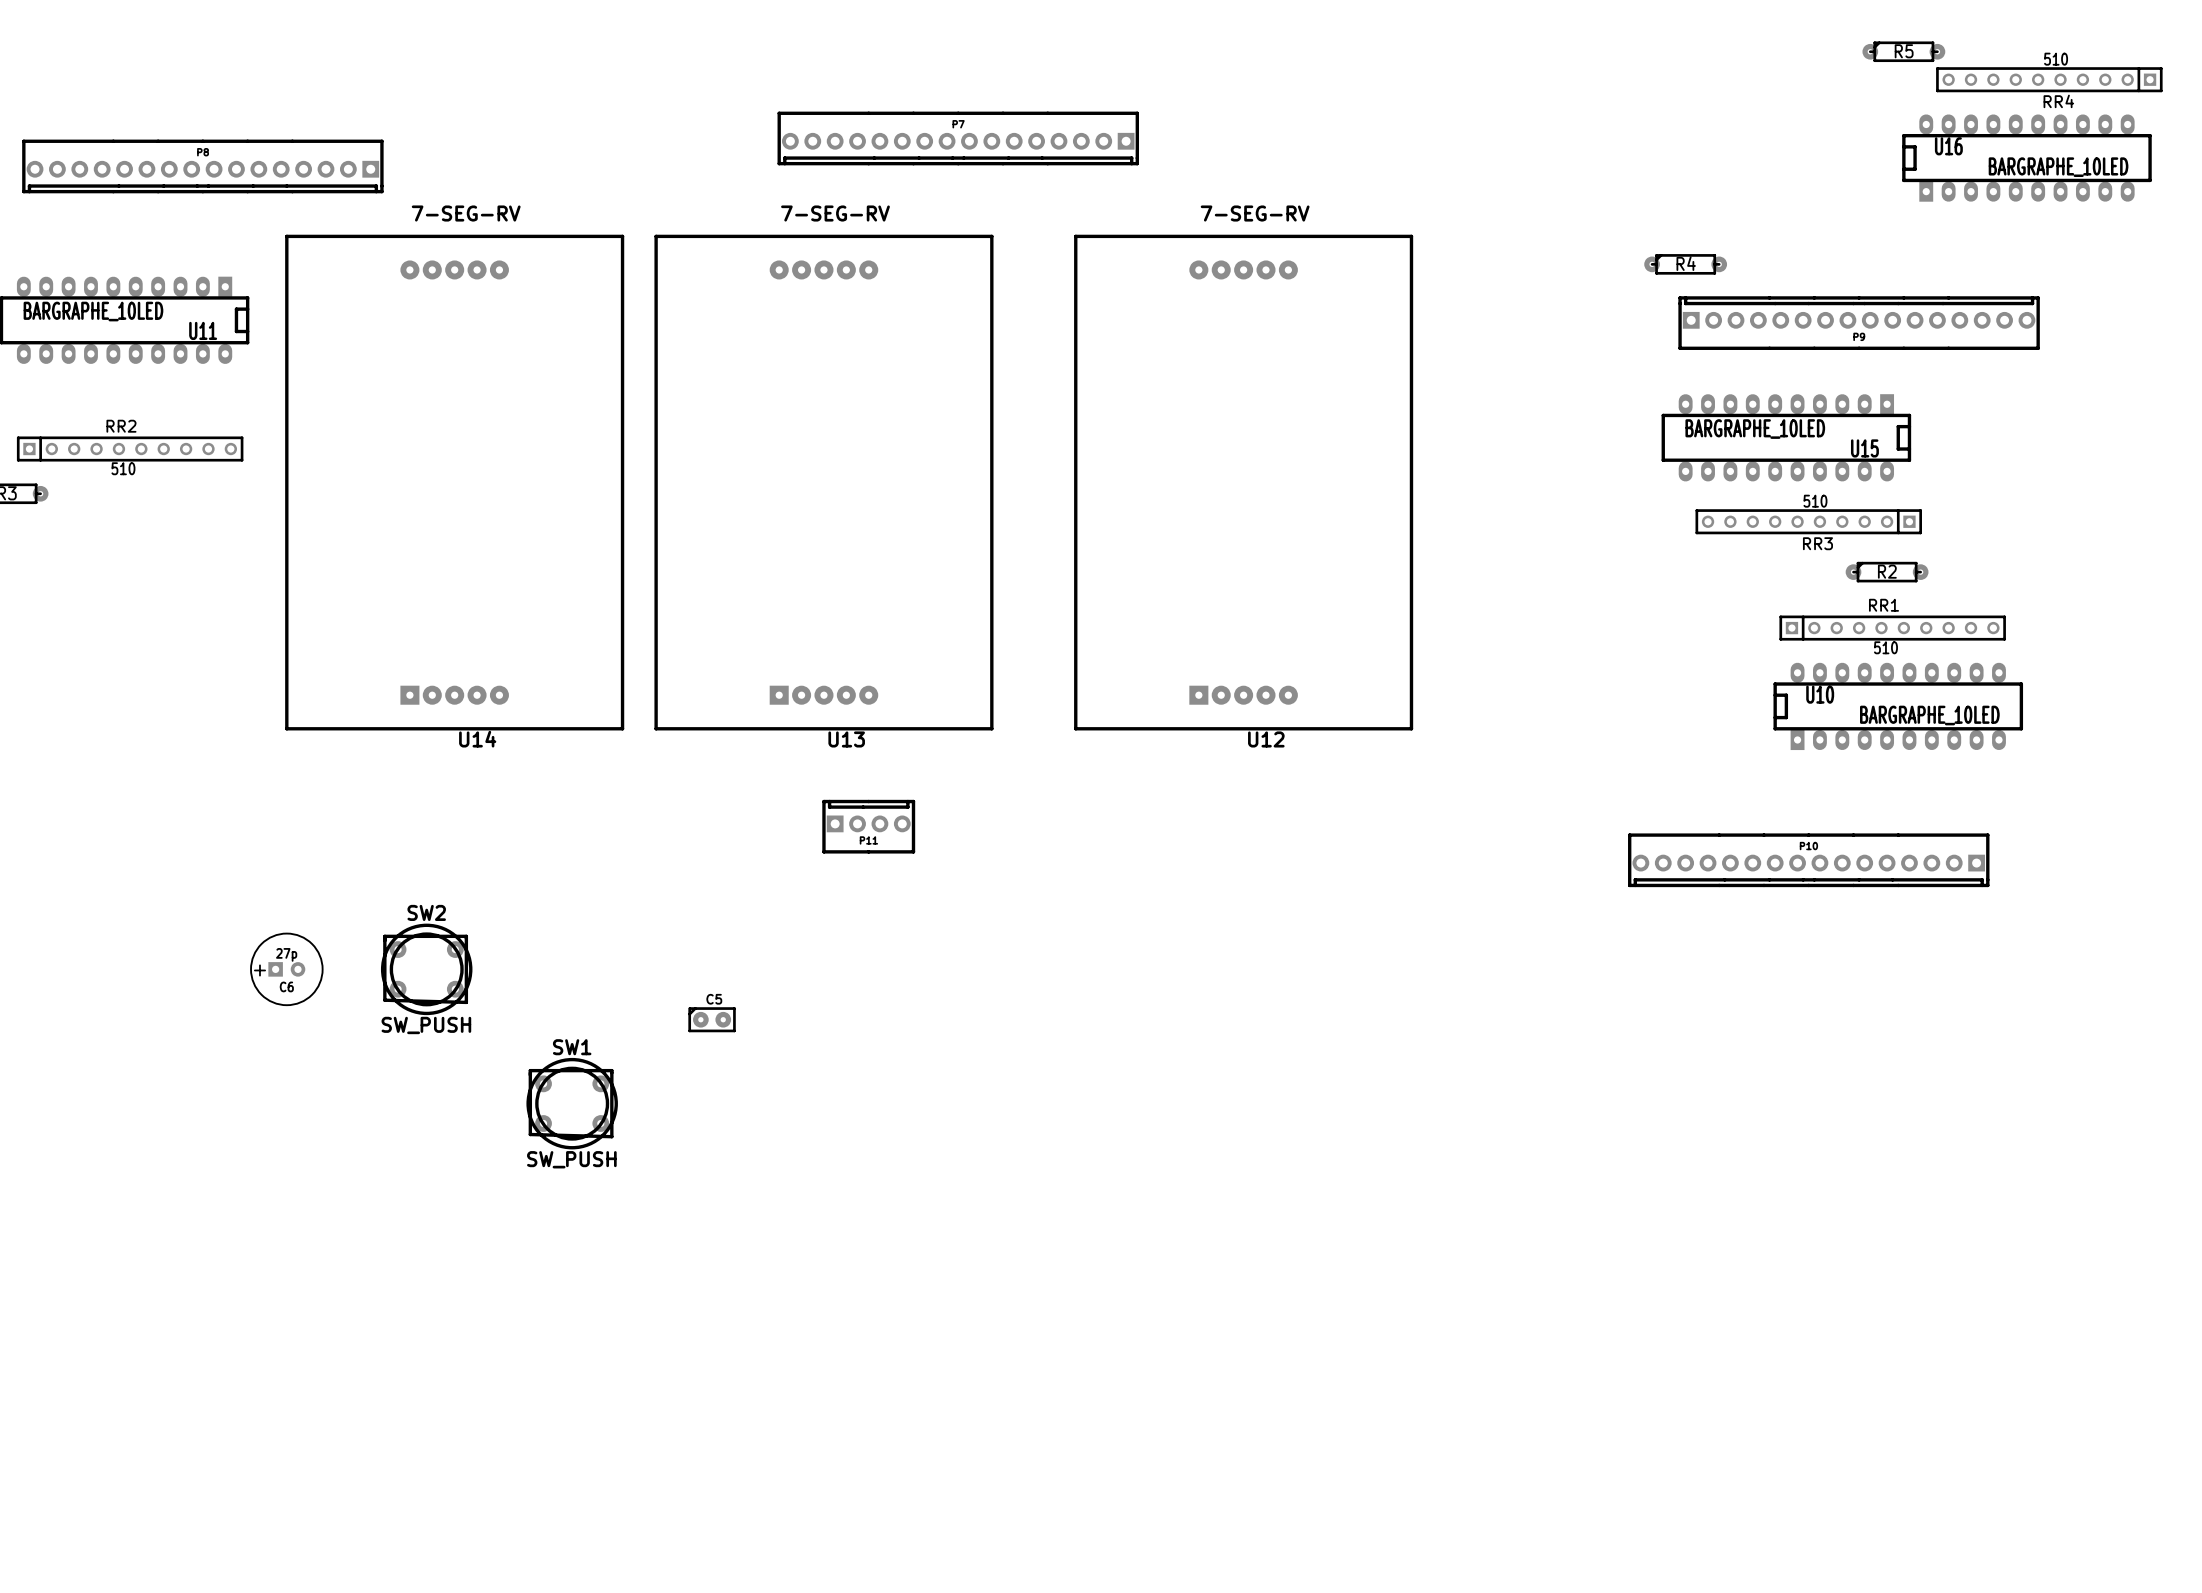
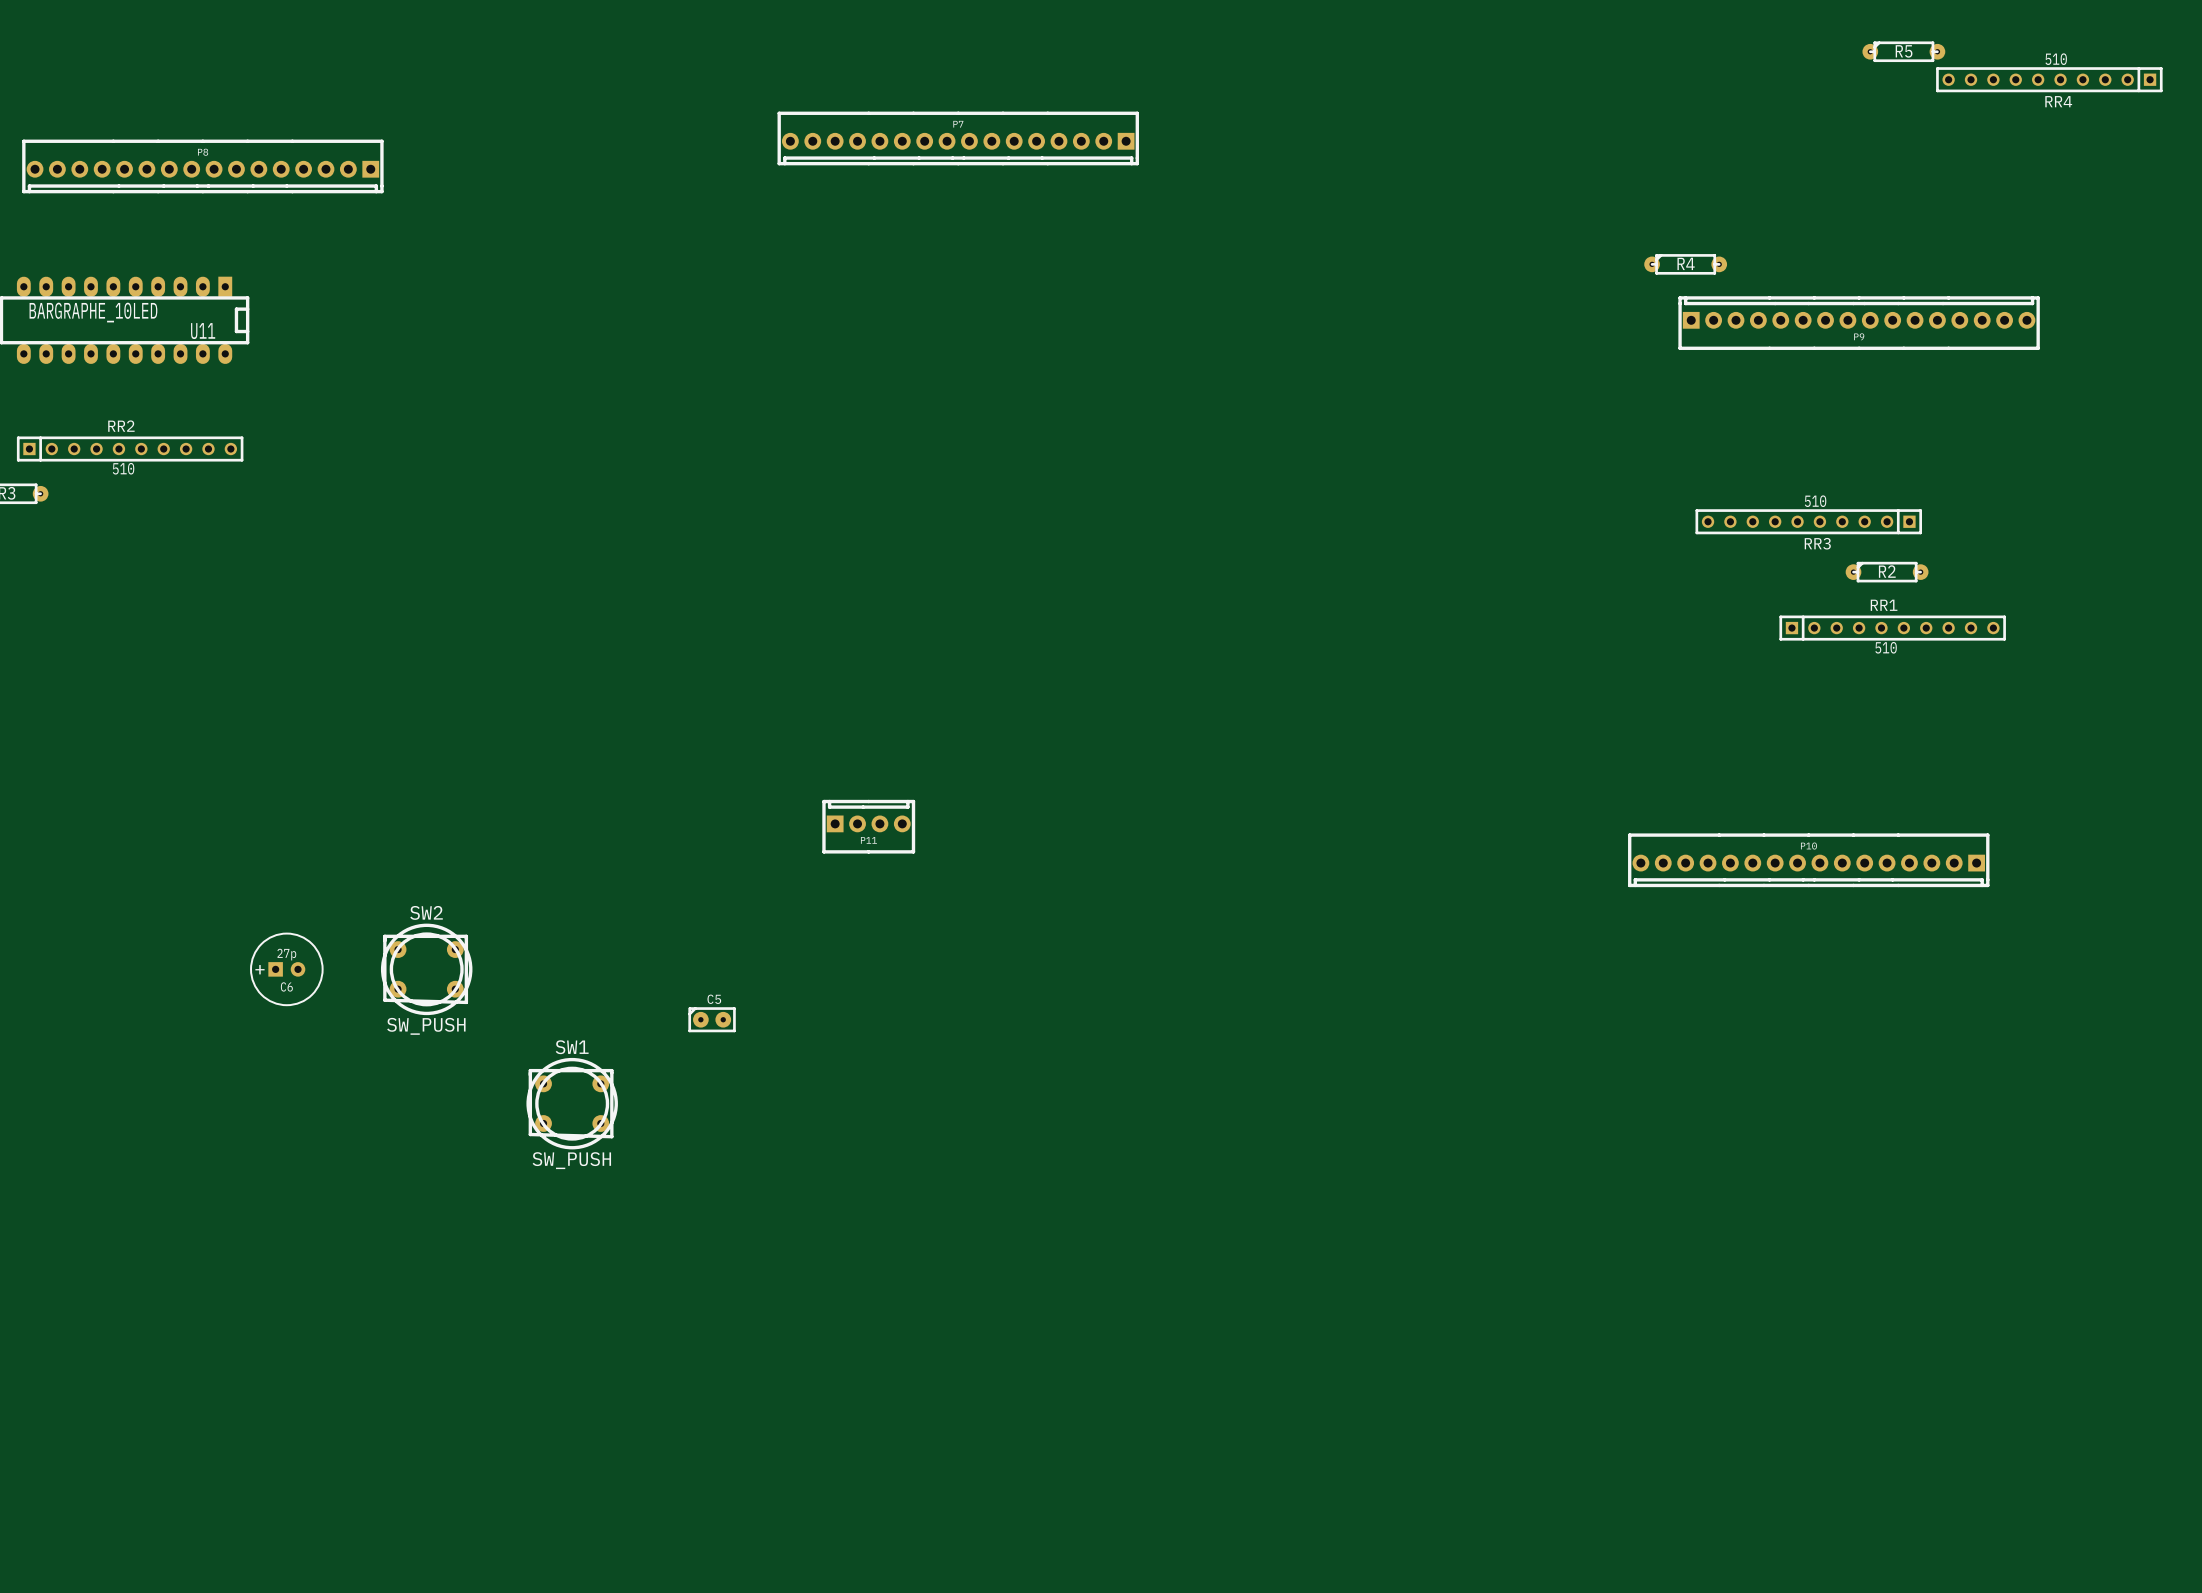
U16: BARGRAPHE_10LED (2026, 158) -> none
U15: BARGRAPHE_10LED (1786, 437) -> none
U14: 7-SEG-RV (454, 482) -> none
U13: 7-SEG-RV (823, 482) -> none
U12: 7-SEG-RV (1243, 482) -> none
U10: BARGRAPHE_10LED (1898, 706) -> none

